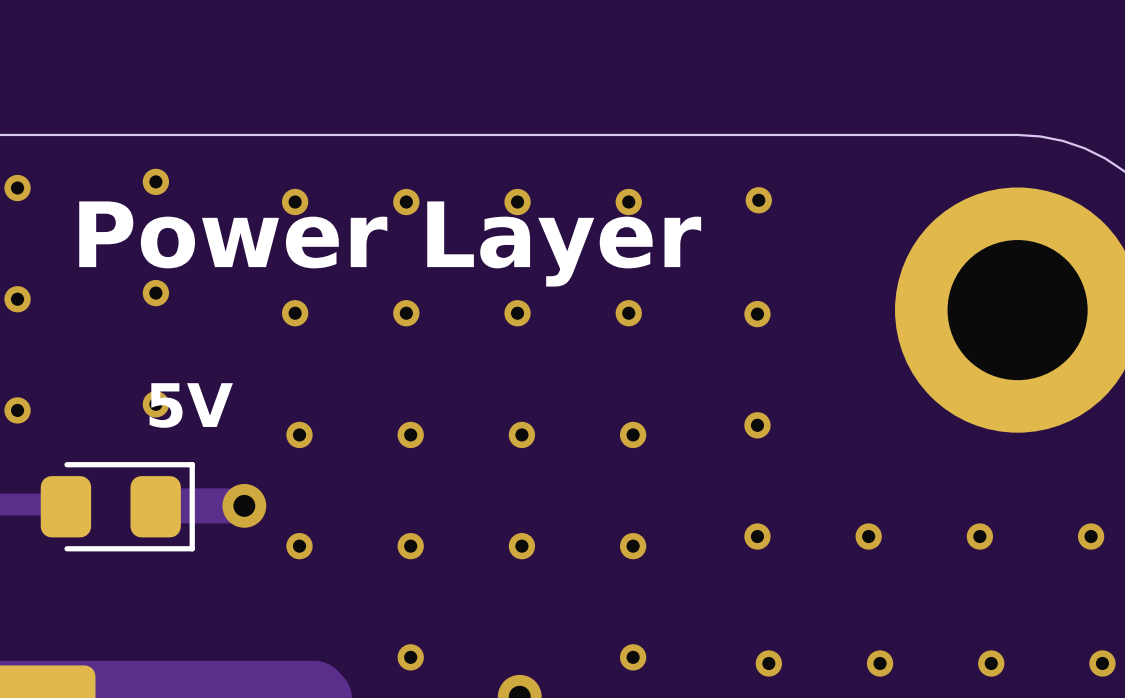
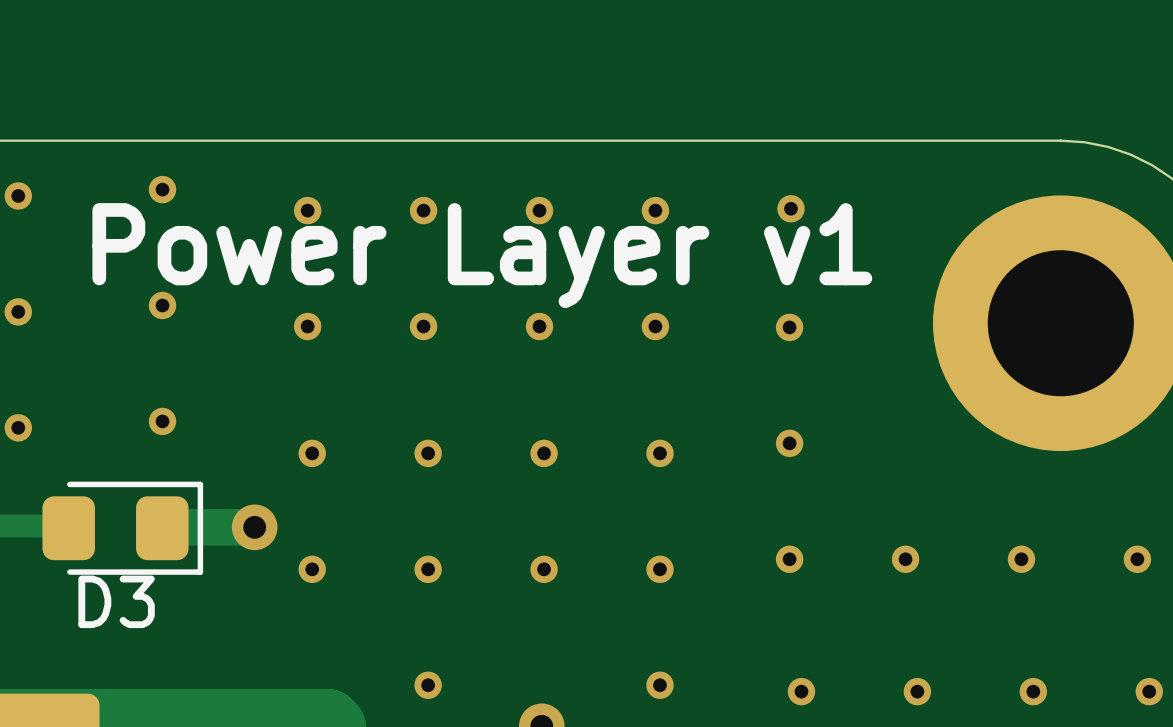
text: Power Layer (390, 243) -> Power Layer v1 (482, 255)
text: 5V (191, 405) -> none
D3 name: none -> D3 (116, 601)

